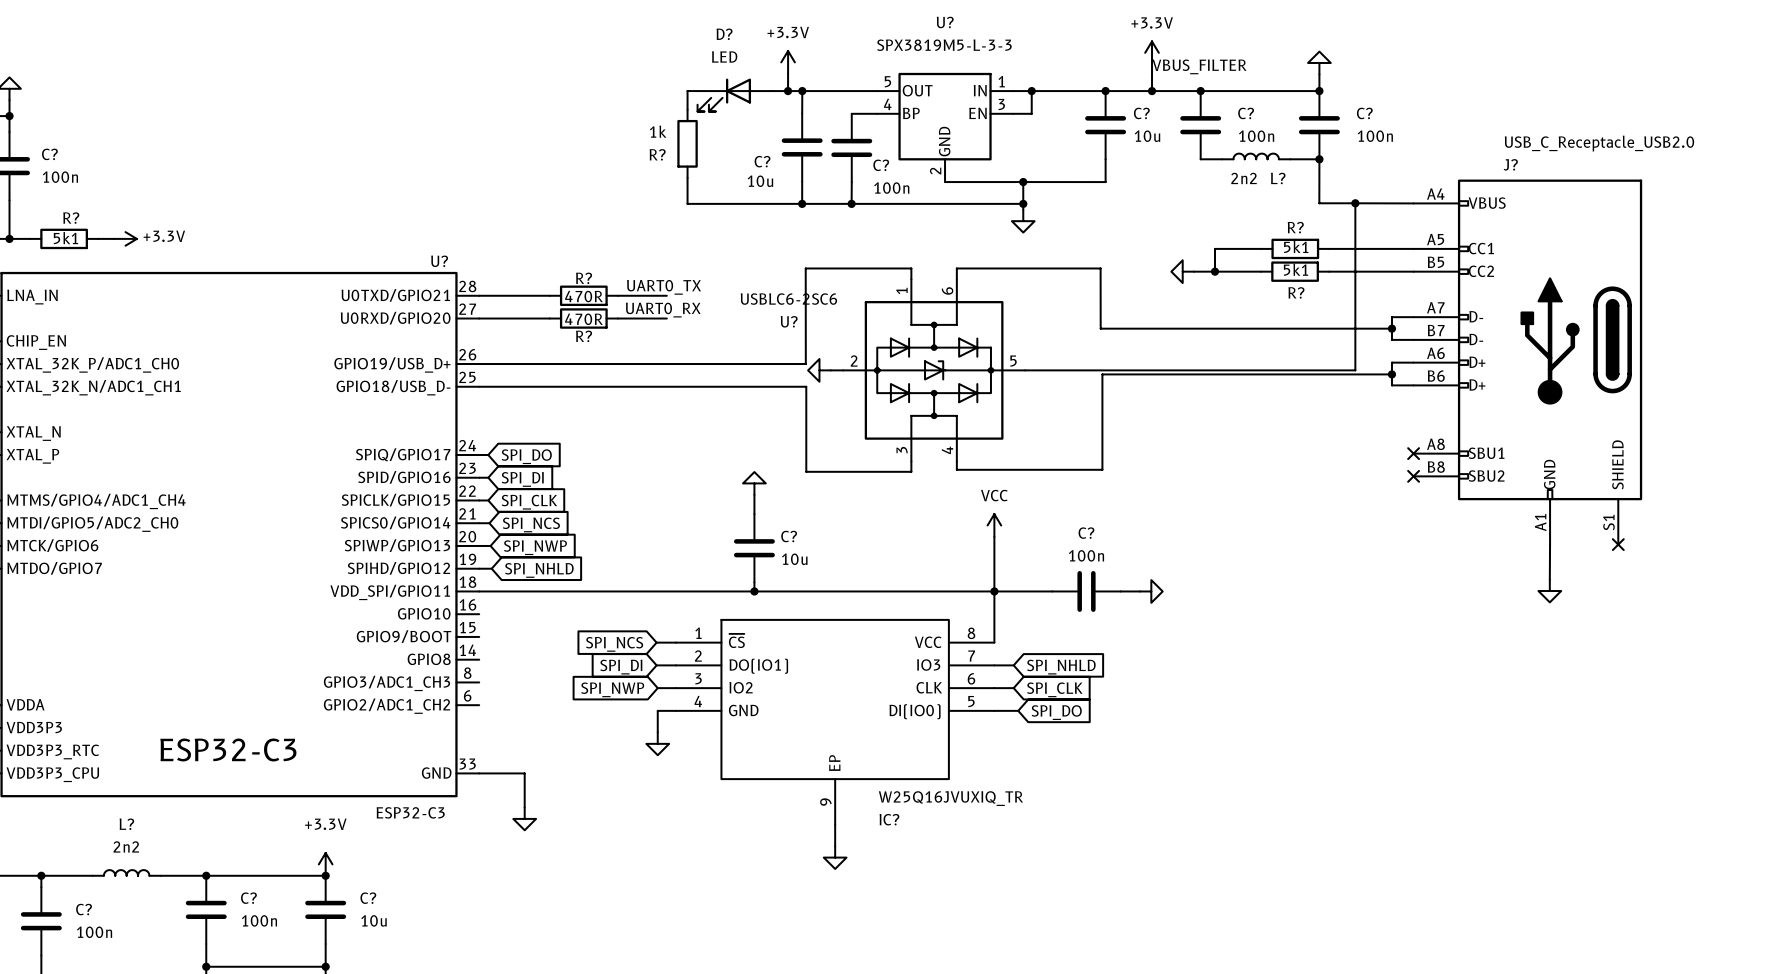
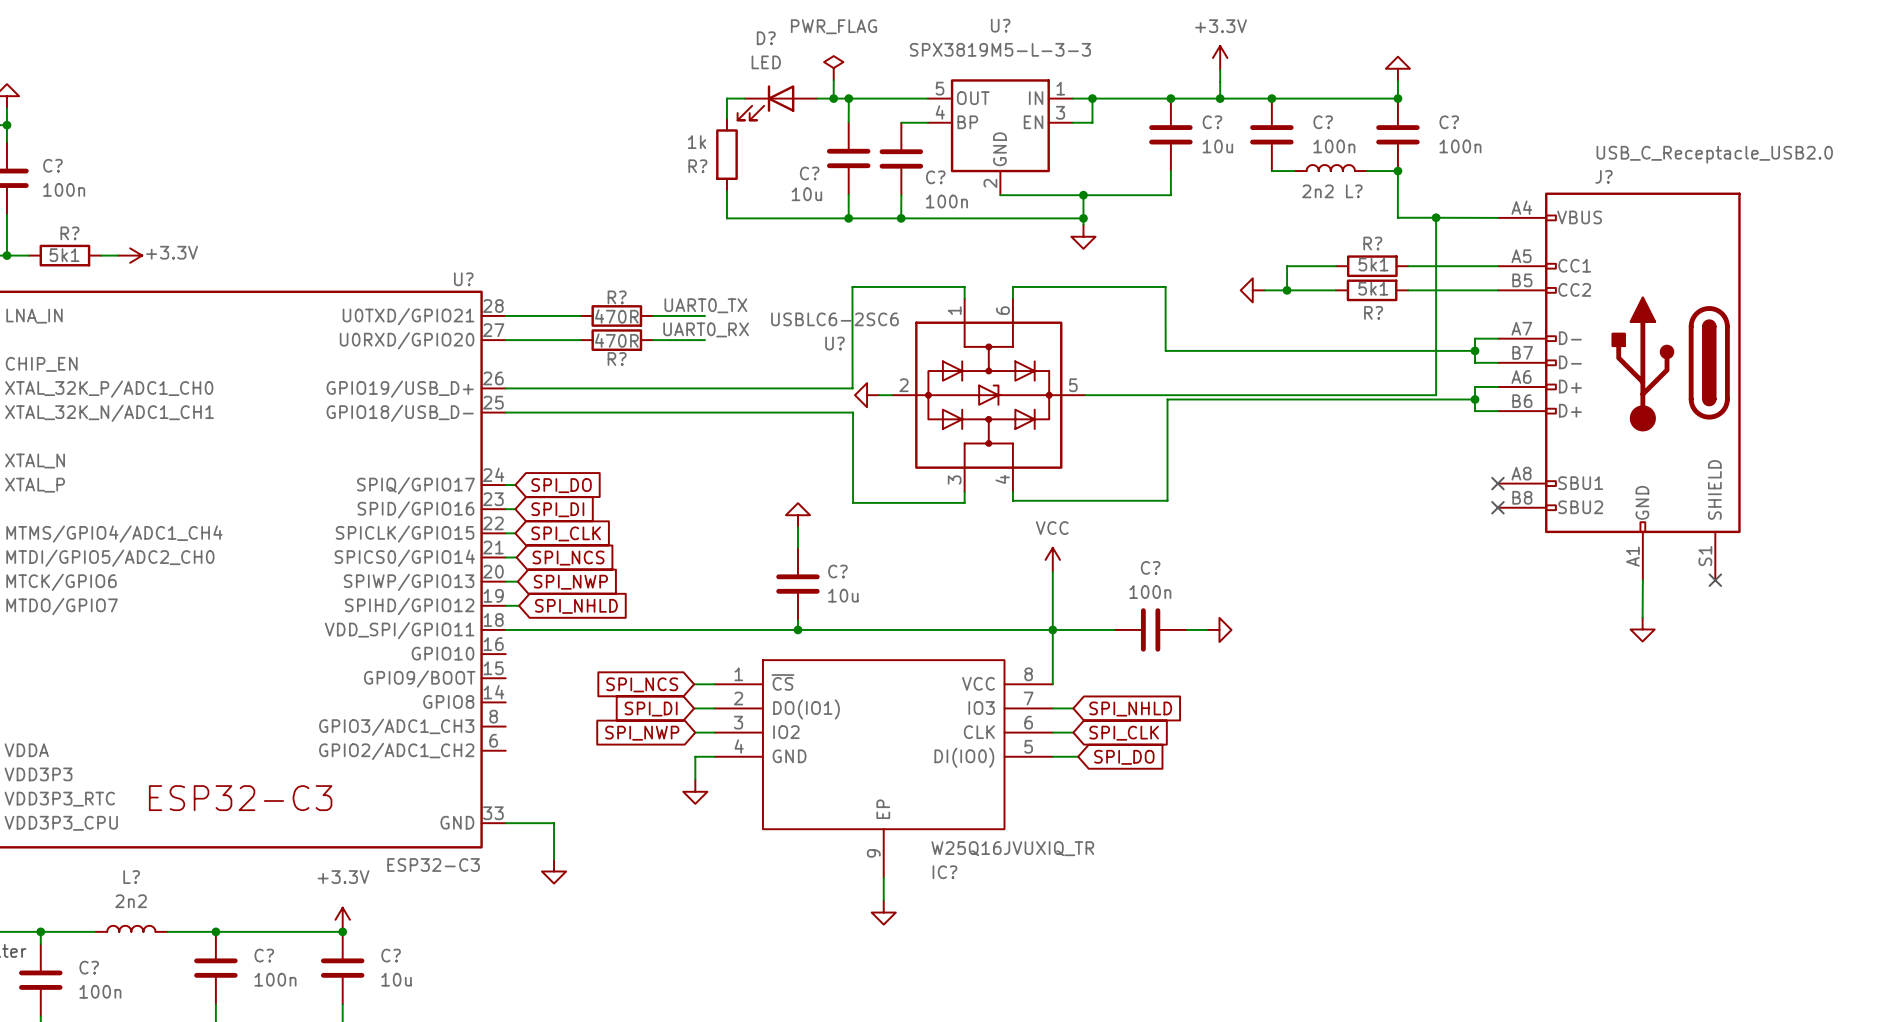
power symbol: +3.3V (788, 62) -> PWR_FLAG (833, 68)
label: VBUS_FILTER (1199, 66) -> none

